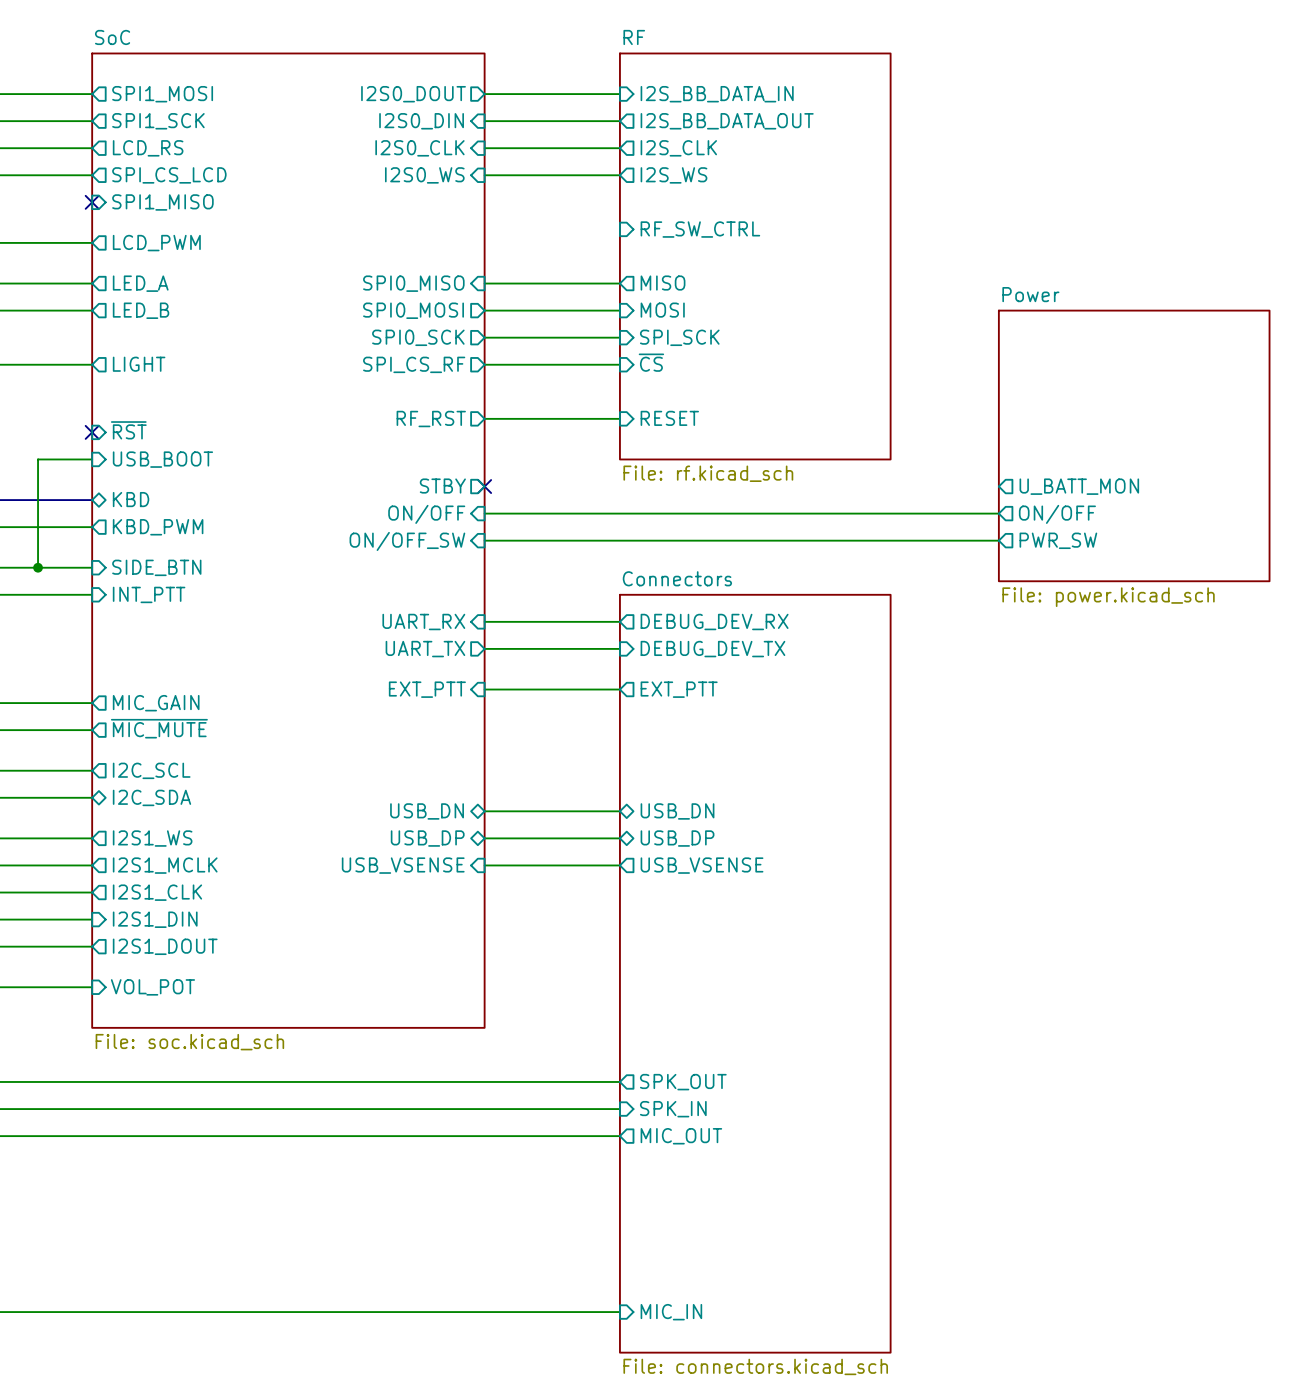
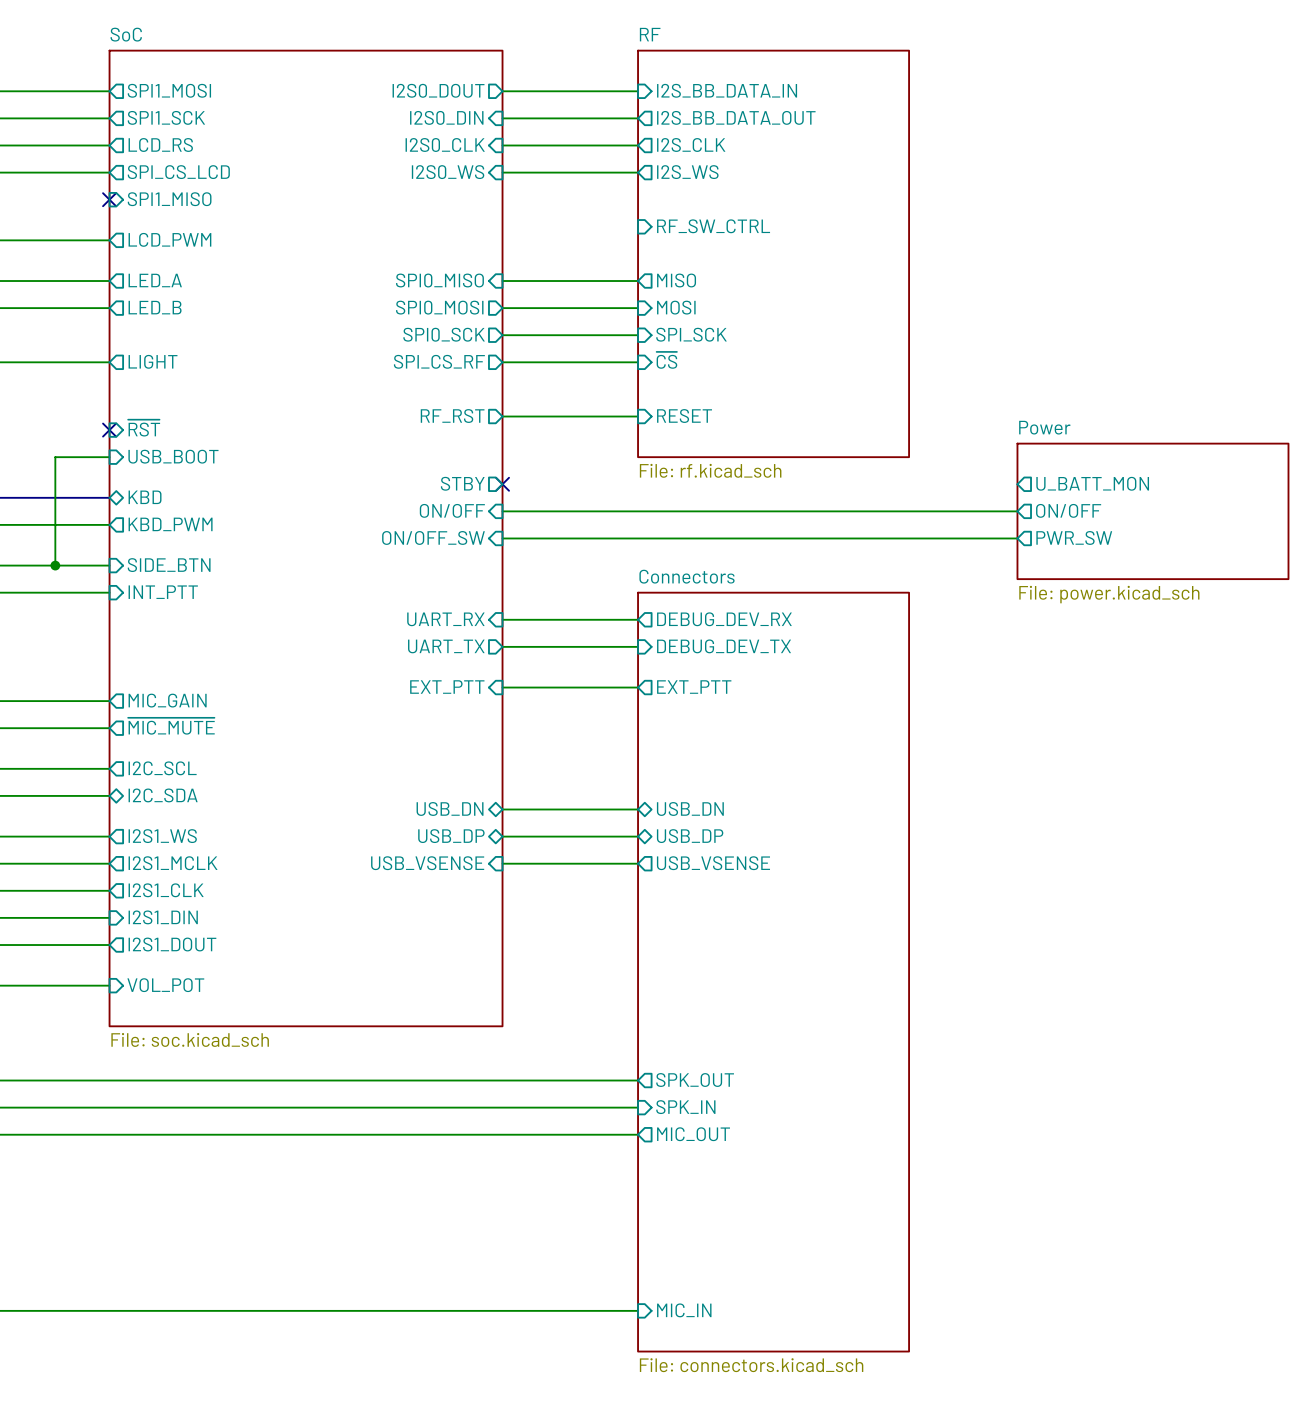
sheet Power: File: power.kicad_sch (1134, 445) -> none
sheet Power: none -> File: power.kicad_sch (1152, 511)

